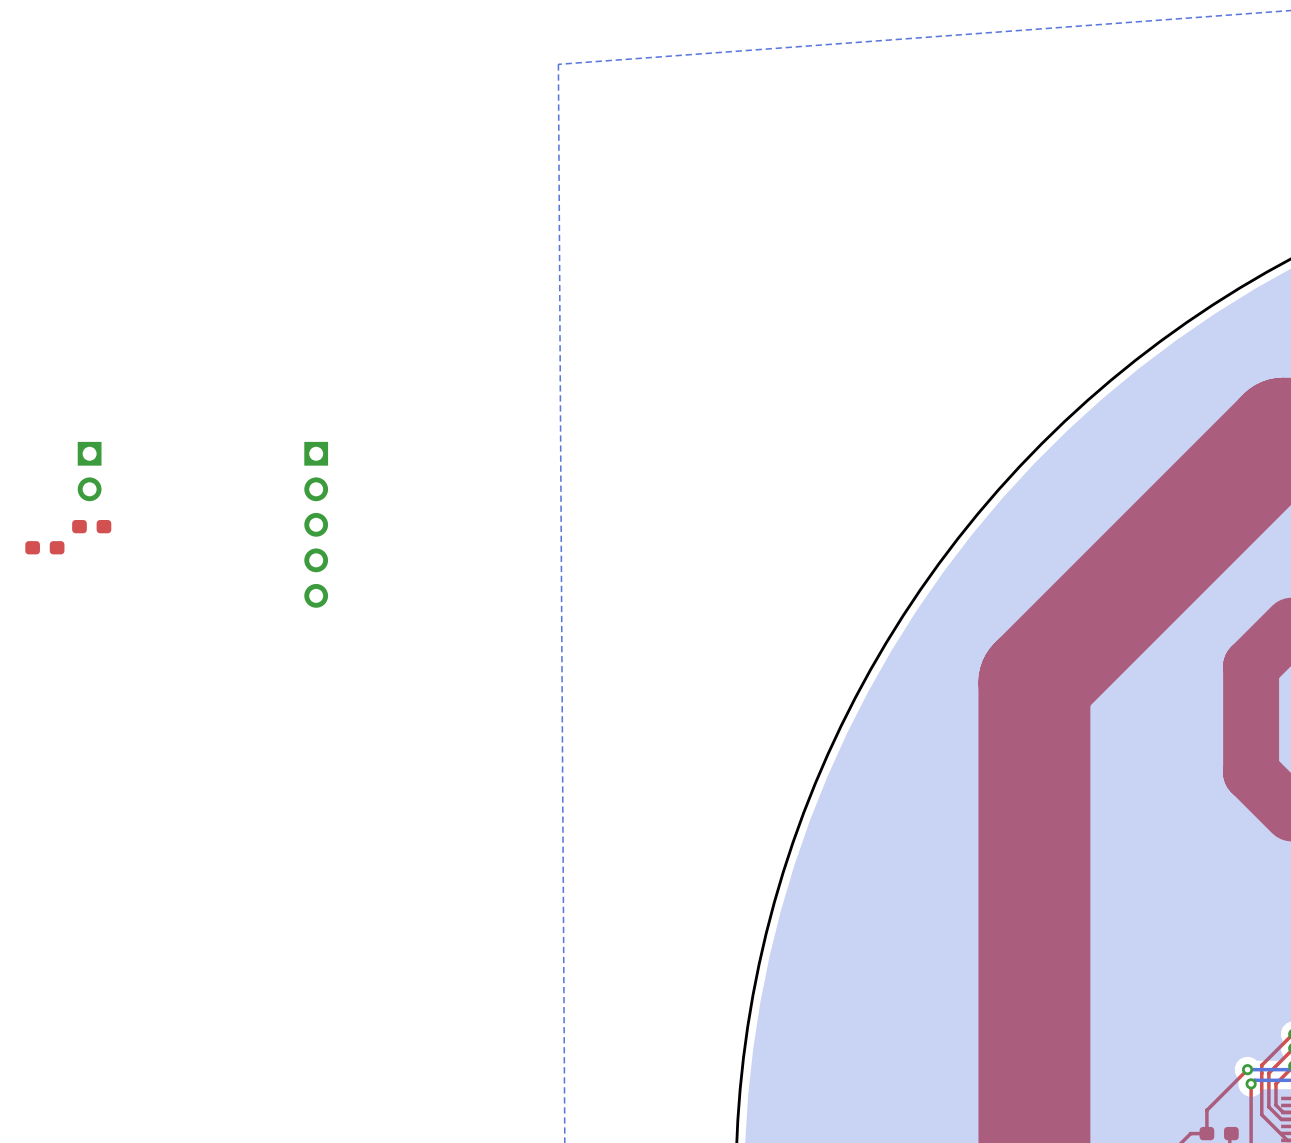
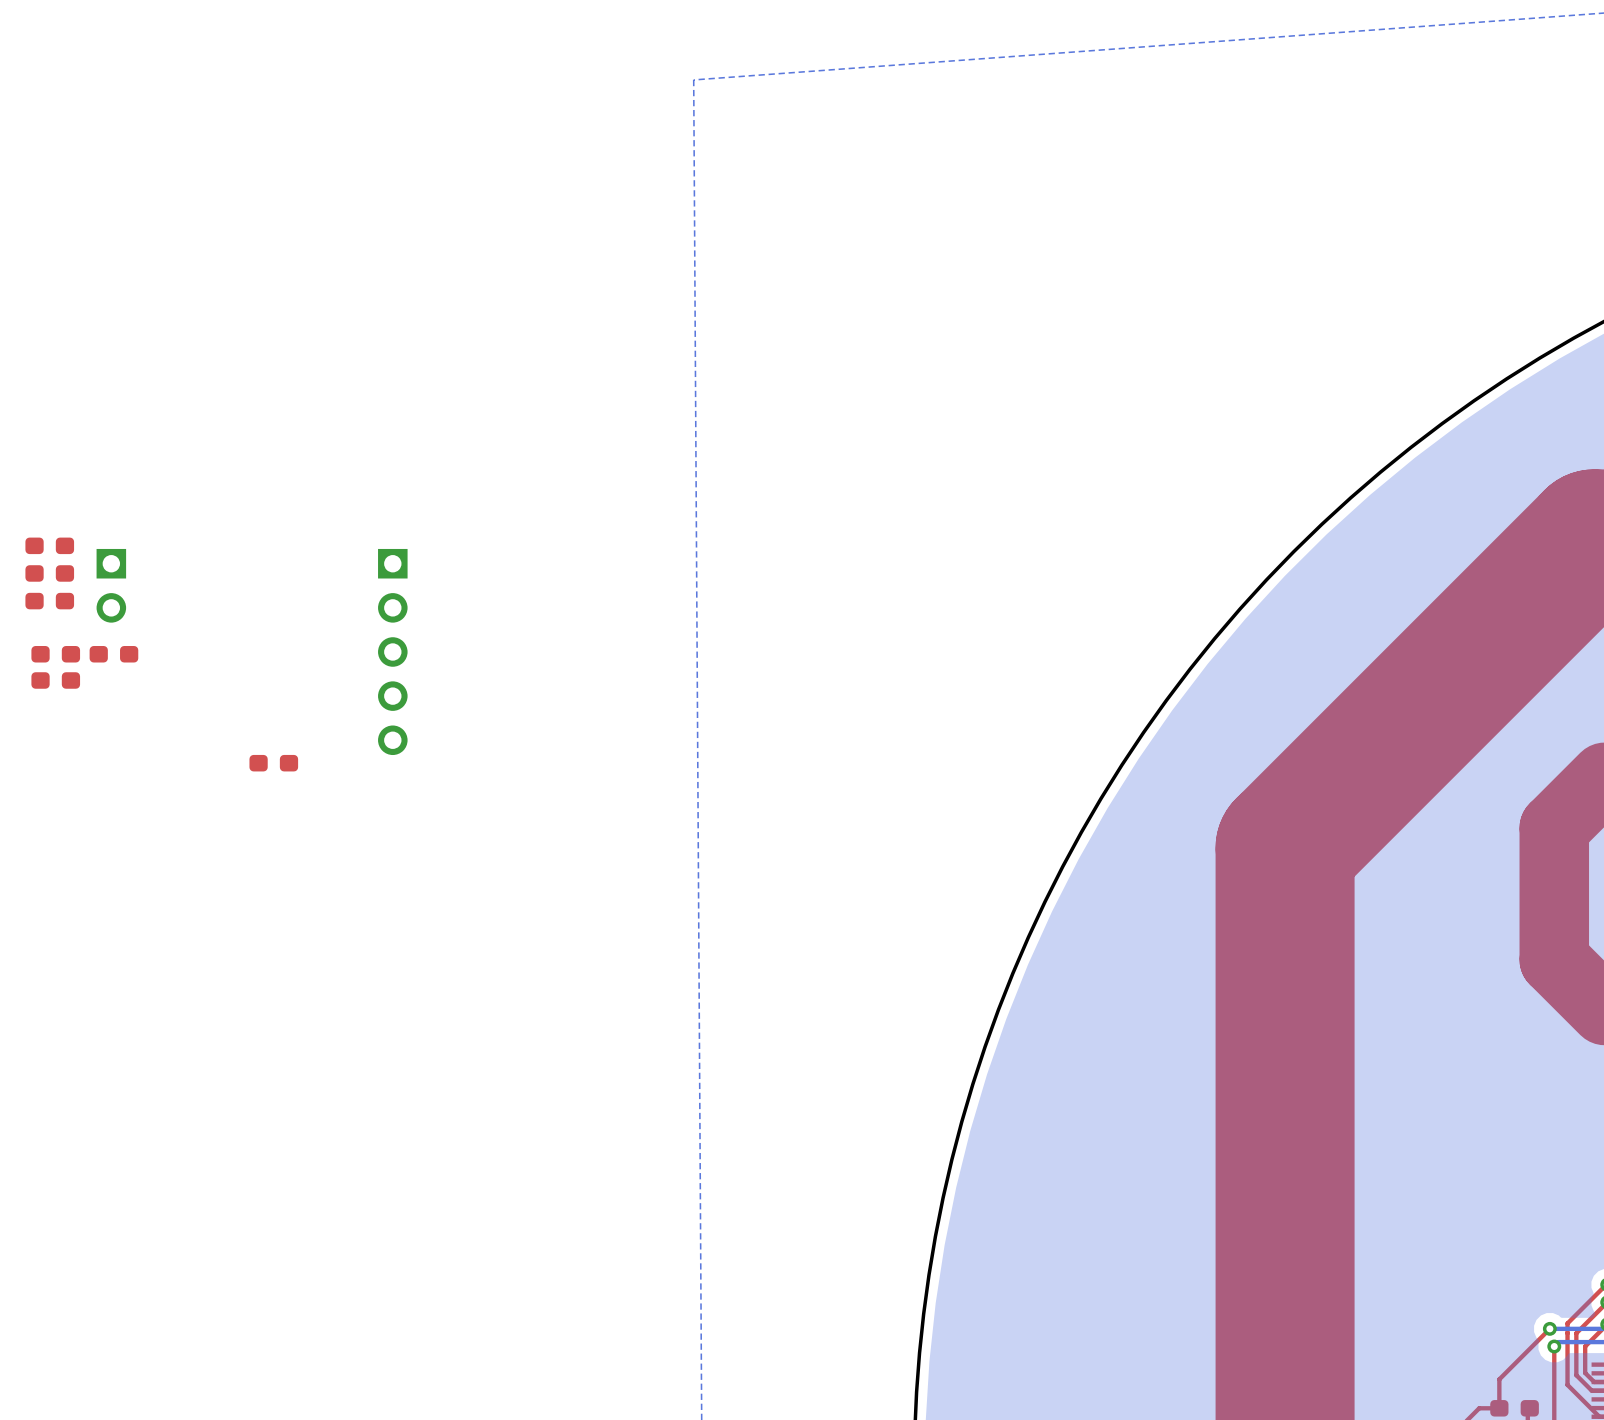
part: none -> (49, 545)
part: none -> (49, 573)
part: none -> (49, 601)
part: none -> (55, 654)
part: none -> (273, 763)

